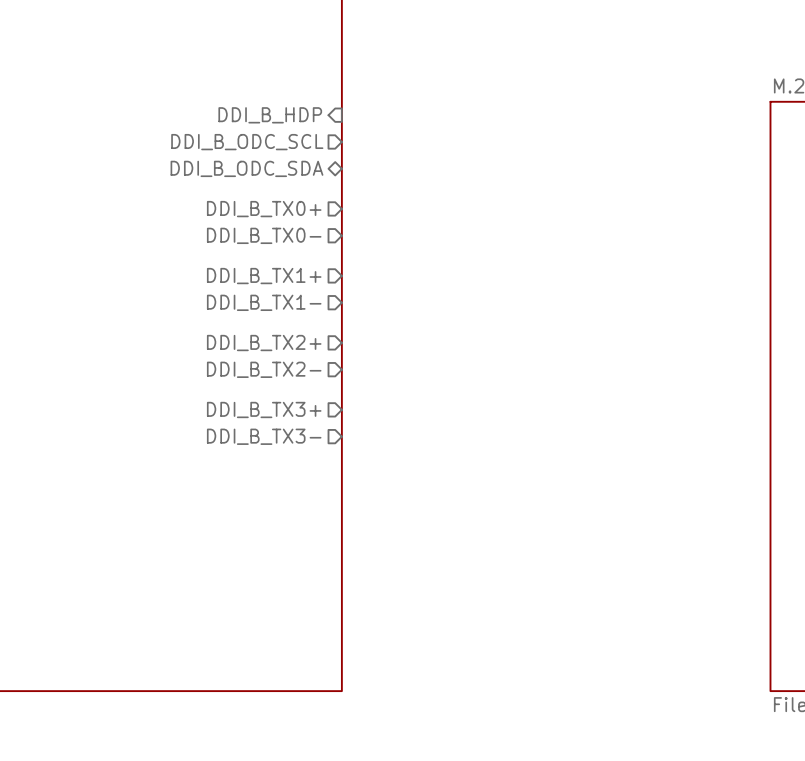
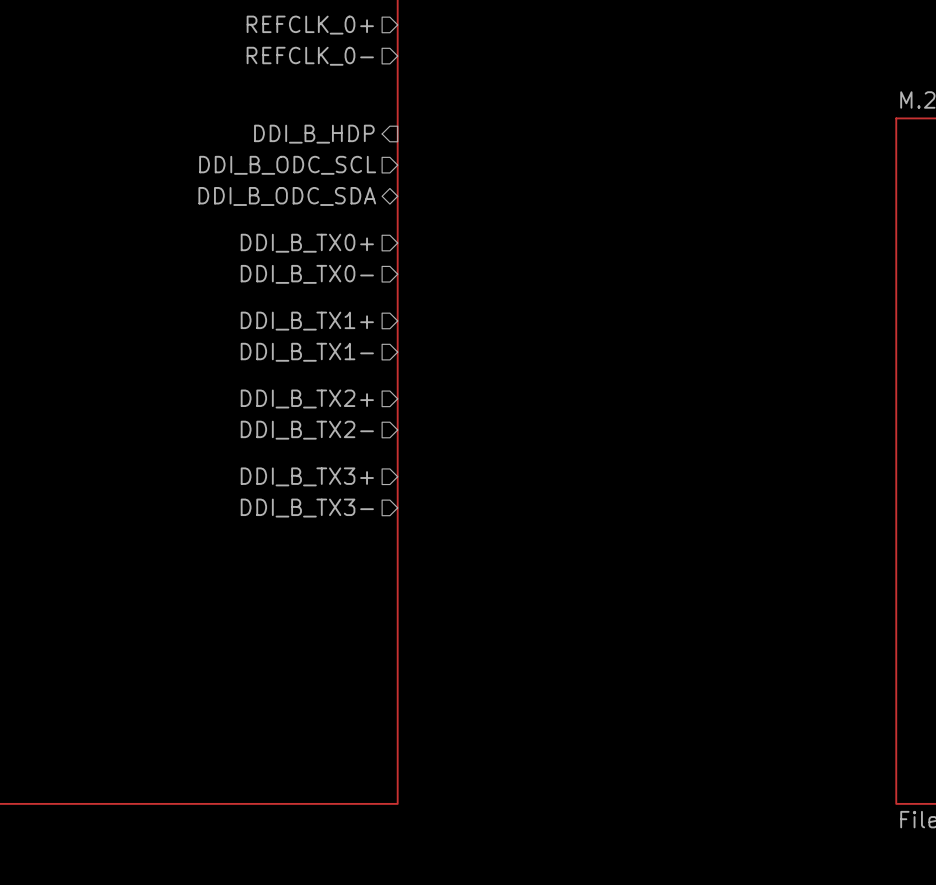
sheet pin: none -> REFCLK_0+ (310, 25)
sheet pin: none -> REFCLK_0- (310, 56)

